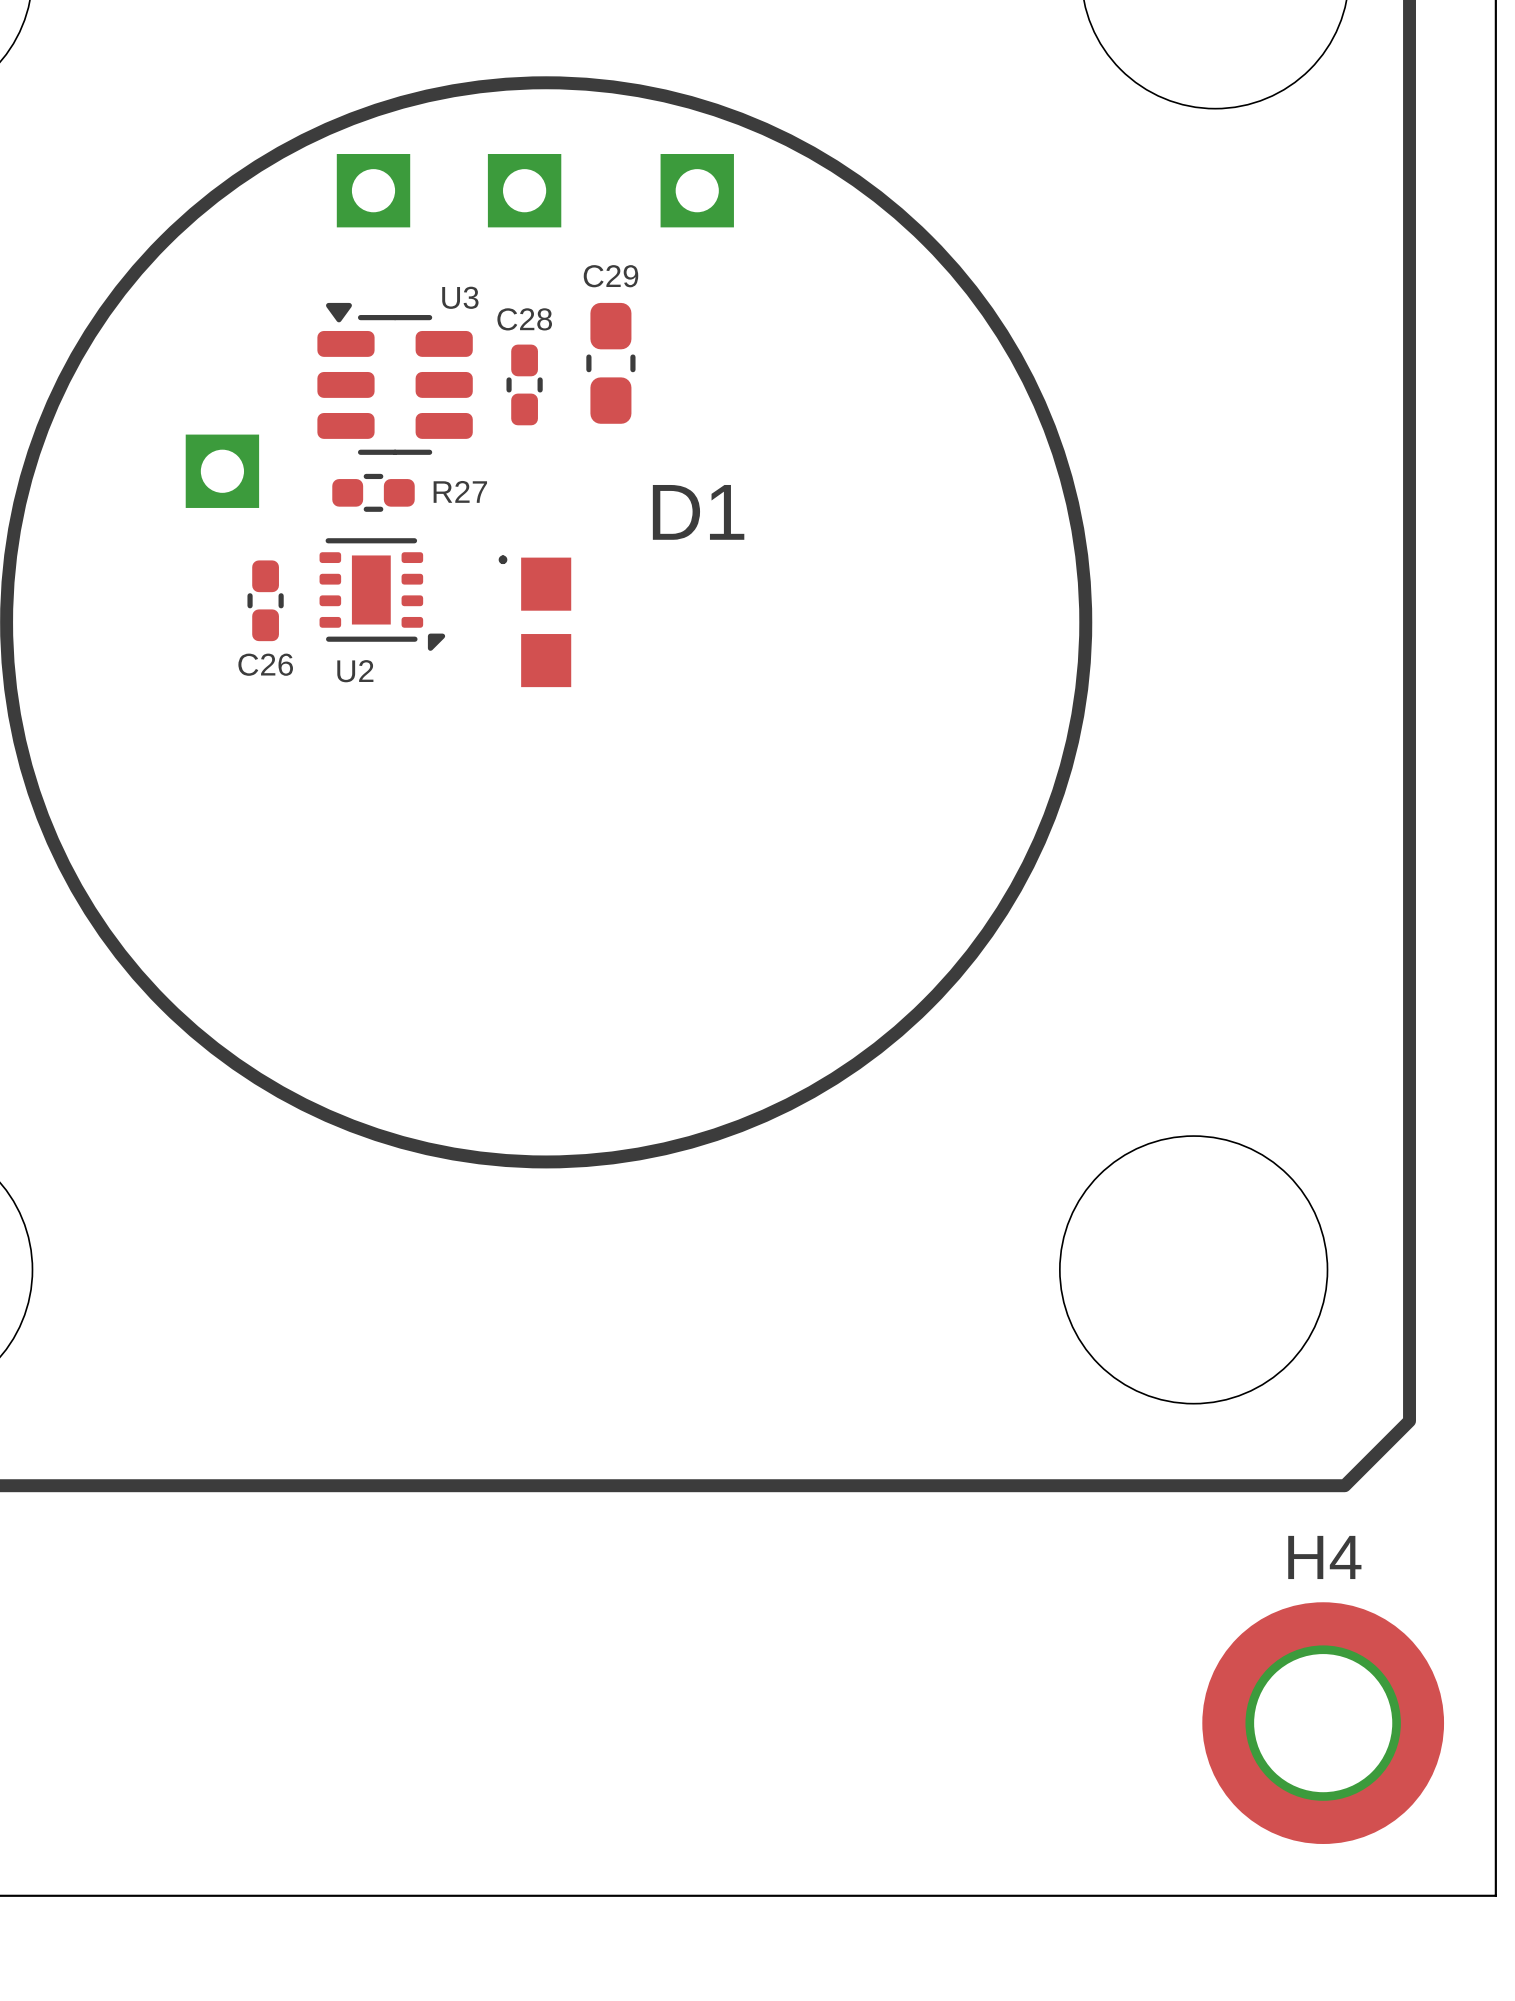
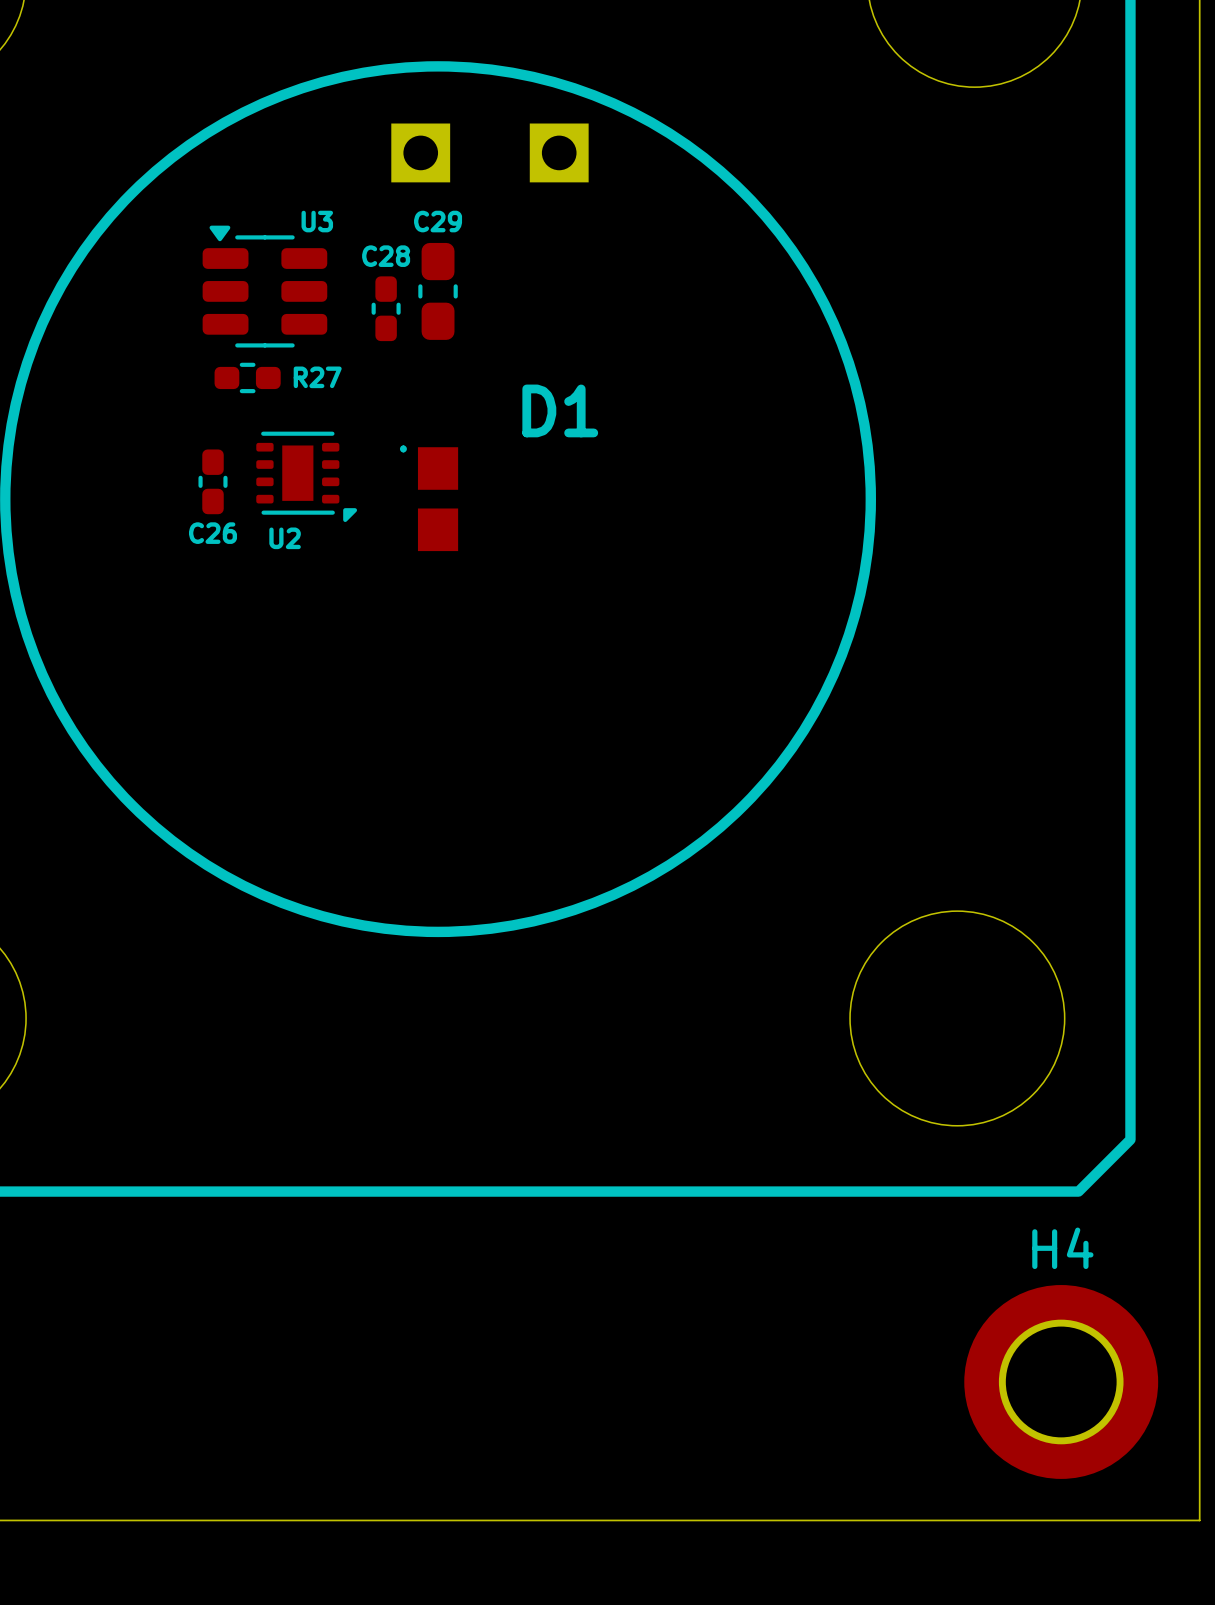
part: (373, 190) -> none
C29 position: (610, 363) -> (438, 291)
U3 position: (395, 378) -> (264, 286)
C28 position: (524, 384) -> (386, 308)
part: (222, 471) -> none
R27 position: (373, 492) -> (247, 377)

